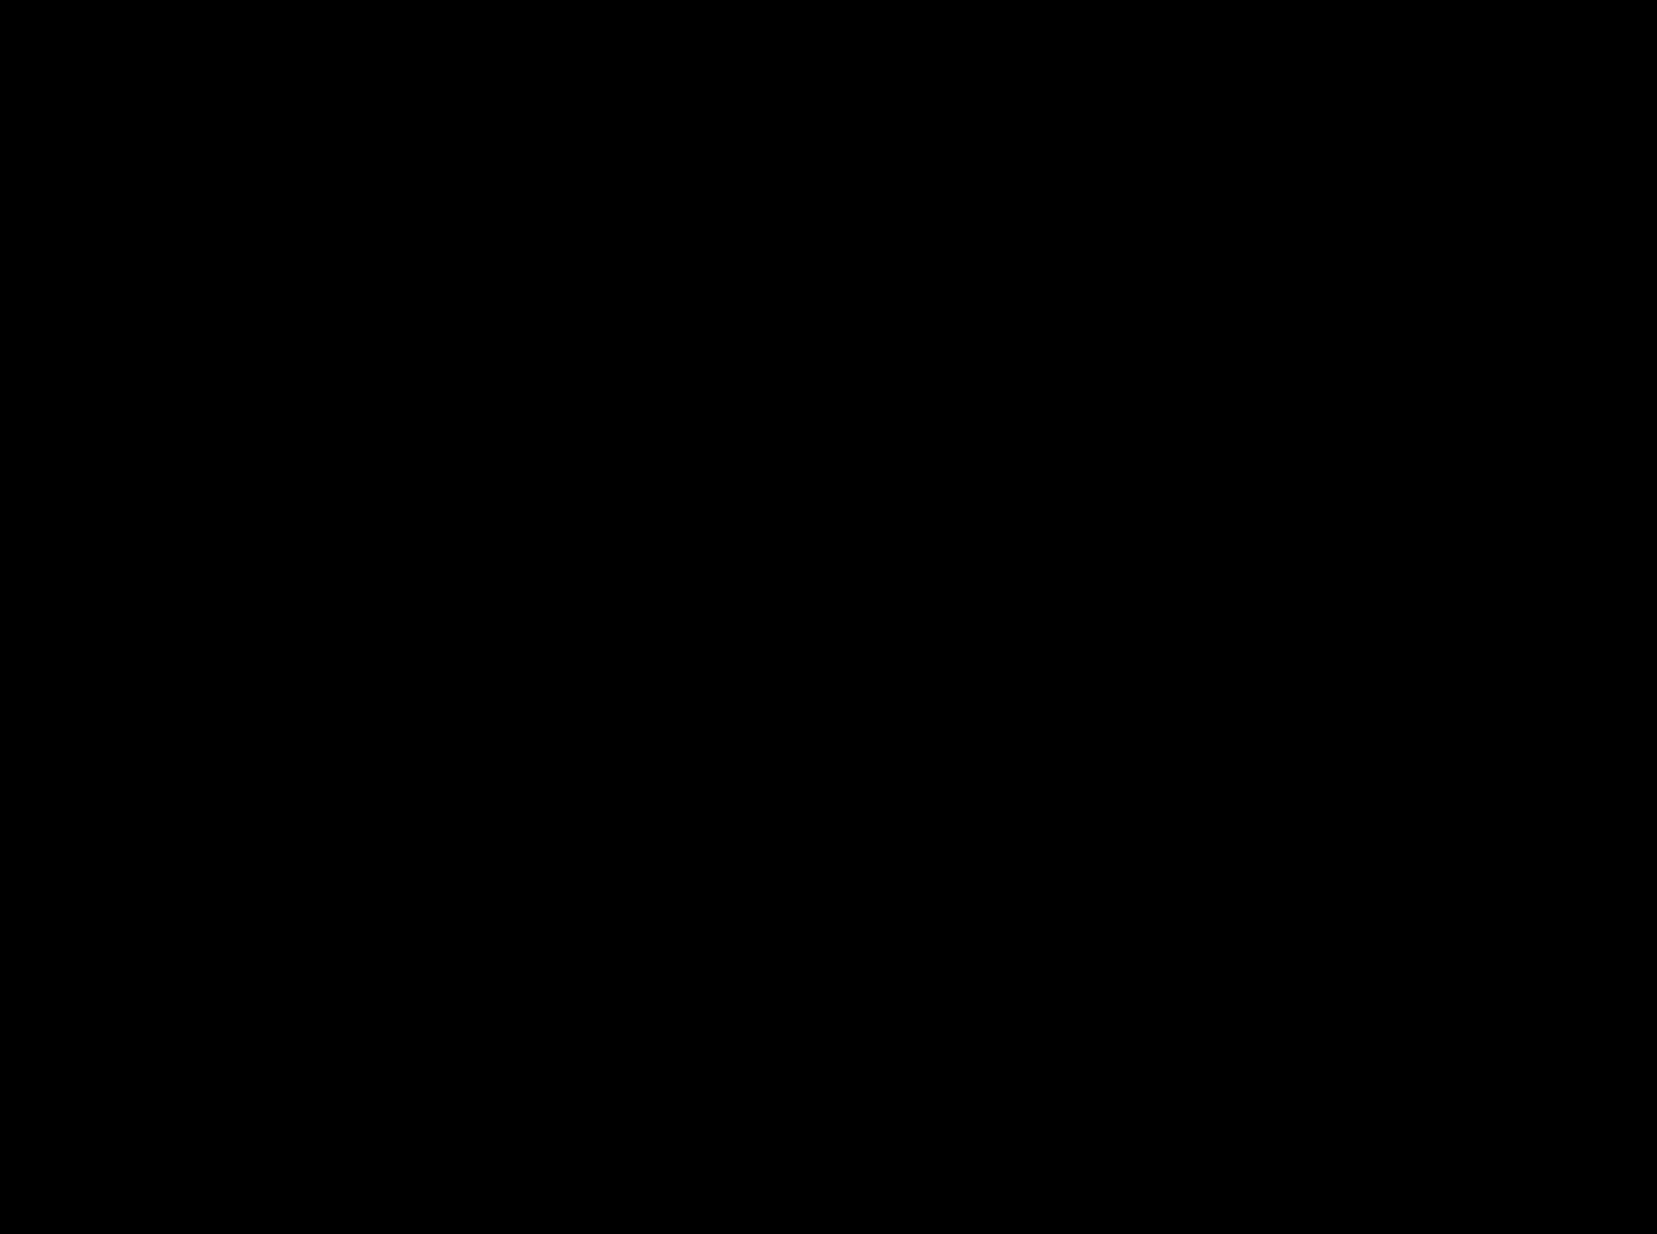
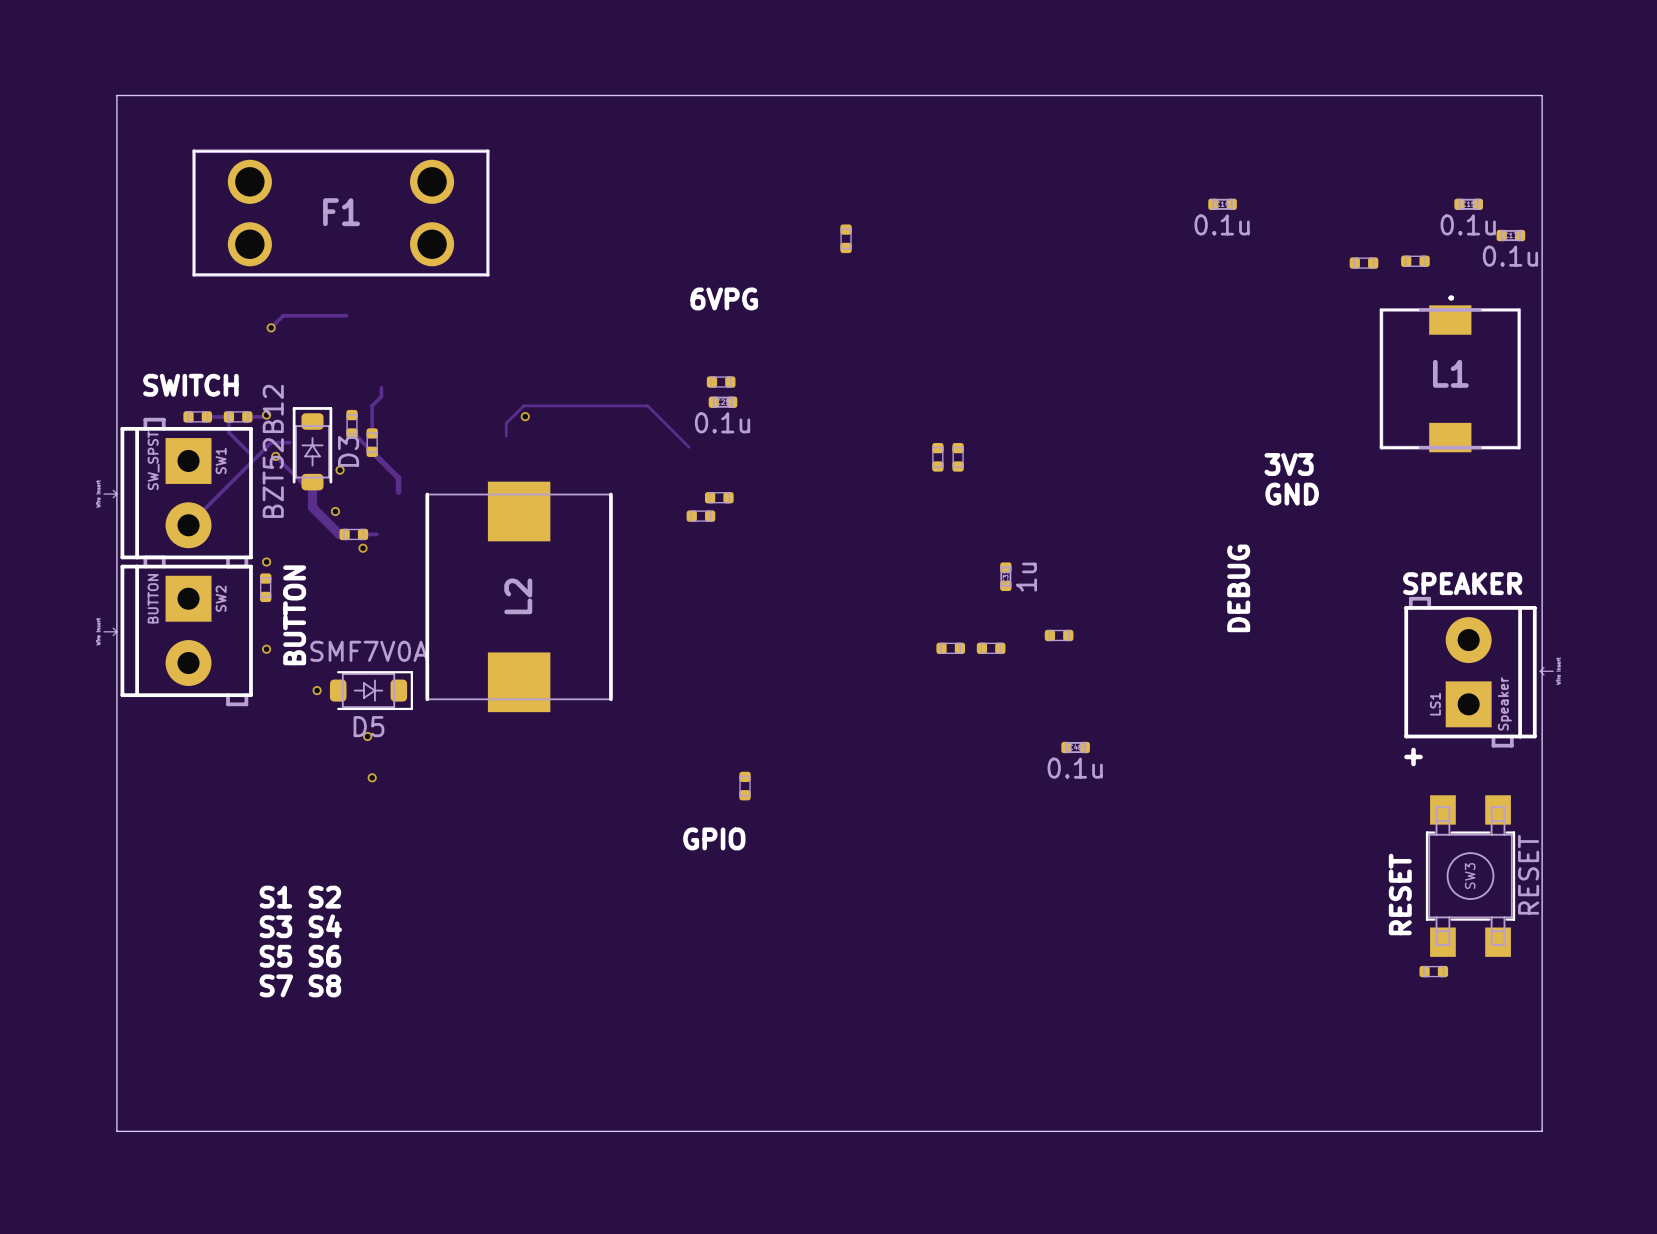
board edge: none -> (116, 95) (1542, 95) (1542, 1131) (116, 1131) (116, 95)
part: none -> 0.1u (1222, 204)
part: none -> 0.1u (1468, 204)
F1: none -> (340, 213)
part: none -> 0.1u (1510, 235)
part: none -> (846, 238)
part: none -> (1415, 261)
part: none -> (1363, 263)
text: none -> 6VPG (724, 298)
track: none -> (346, 315) (283, 315) (271, 327)
via: none -> (271, 327)
L1: none -> (1450, 373)
part: none -> (721, 382)
text: none -> SWITCH (190, 385)
track: none -> (381, 387) (381, 396) (372, 405) (372, 433)
part: none -> 0.1u (722, 402)
track: none -> (266, 415) (264, 416) (247, 416)
via: none -> (266, 415)
part: none -> (197, 416)
track: none -> (206, 416) (228, 416) (228, 432) (248, 451)
part: none -> (238, 416)
via: none -> (525, 416)
part: none -> (351, 424)
track: none -> (351, 433) (398, 478) (398, 492)
track: none -> (506, 436) (506, 423) (523, 405) (647, 405) (689, 447)
track: none -> (289, 442) (271, 442) (188, 525)
part: none -> (372, 442)
D3: none -> BZT52B12 (312, 448)
track: none -> (275, 456) (301, 482) (312, 482) (312, 507) (339, 534) (344, 534)
via: none -> (275, 456)
part: none -> (937, 457)
part: none -> (958, 457)
text: none -> 3V3 (1289, 464)
via: none -> (340, 470)
SW1: none -> SW_SPST (178, 493)
text: none -> GND (1292, 494)
part: none -> (719, 497)
via: none -> (335, 511)
part: none -> (700, 516)
part: none -> (353, 534)
track: none -> (363, 534) (376, 534)
via: none -> (363, 548)
via: none -> (266, 562)
part: none -> 1u (1005, 576)
text: none -> SPEAKER (1462, 583)
part: none -> (265, 587)
text: none -> DEBUG (1238, 588)
L2: none -> (519, 596)
text: none -> BUTTON (294, 615)
SW2: none -> BUTTON (178, 630)
part: none -> (1059, 635)
part: none -> (950, 648)
part: none -> (991, 648)
via: none -> (266, 649)
LS1: none -> Speaker (1478, 672)
via: none -> (317, 690)
D5: none -> SMF7V0A (371, 690)
via: none -> (367, 736)
part: none -> 0.1u (1075, 747)
text: none -> + (1413, 756)
via: none -> (372, 777)
part: none -> (745, 786)
text: none -> GPIO (714, 838)
SW3: none -> RESET (1470, 876)
text: none -> RESET (1400, 894)
text: none -> S1 S2 (300, 897)
text: none -> S3 S4 (300, 926)
text: none -> S5 S6 (300, 956)
part: none -> (1433, 971)
text: none -> S7 S8 (300, 985)

